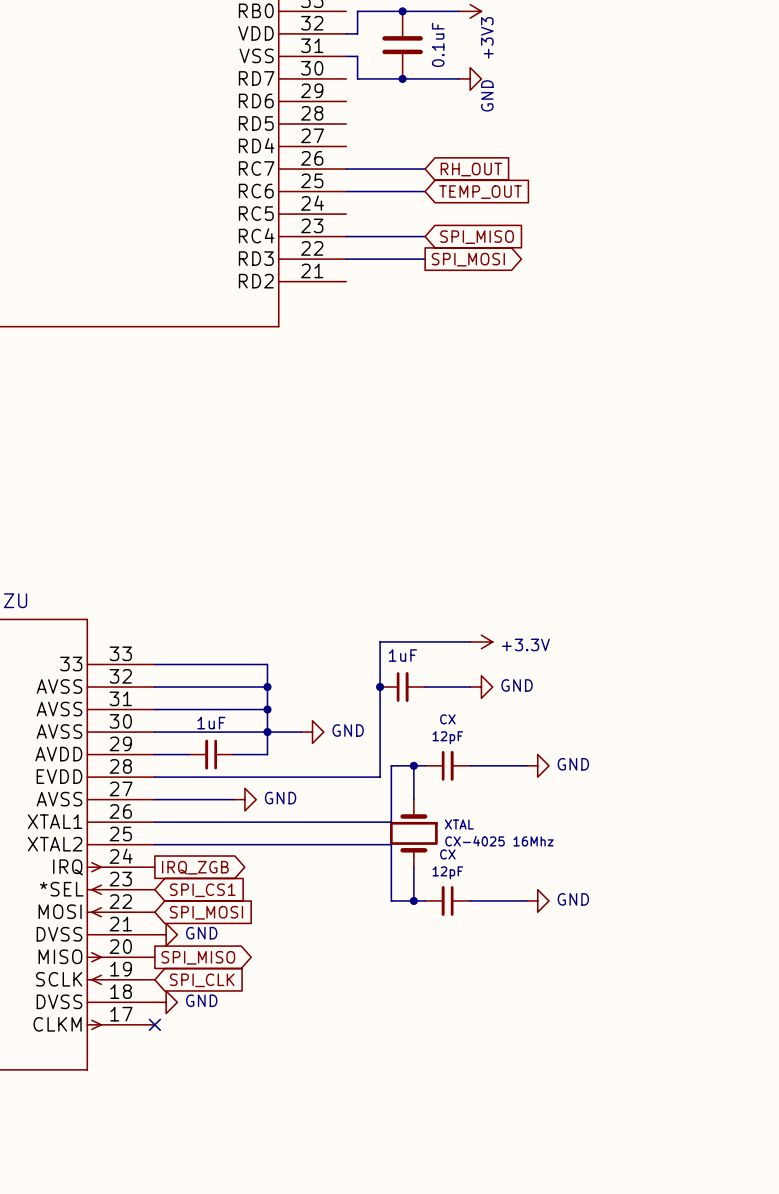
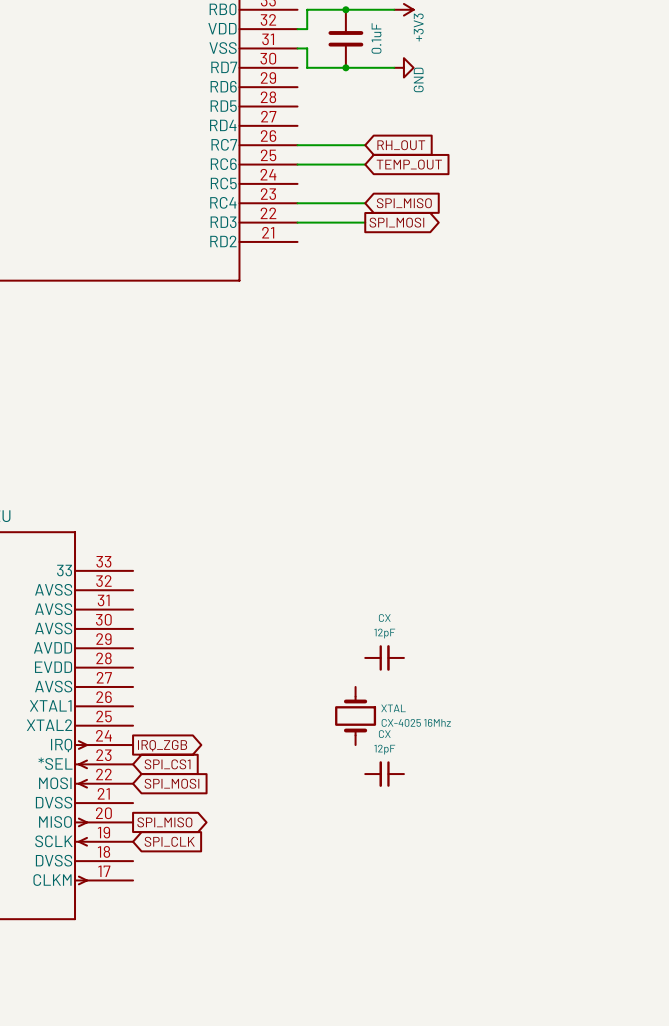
wire: (470, 641) (380, 641) (380, 777) (154, 777) -> none
power symbol: +3.3V (481, 641) -> none
wire: (154, 664) (267, 664) (267, 754) (233, 754) -> none
wire: (154, 687) (267, 687) -> none
junction: (267, 687) -> none
junction: (380, 687) -> none
part: 1uF (402, 687) -> none
wire: (425, 687) (470, 687) -> none
power symbol: GND (481, 687) -> none
wire: (154, 709) (267, 709) -> none
junction: (267, 709) -> none
wire: (154, 732) (301, 732) -> none
junction: (267, 732) -> none
power symbol: GND (312, 732) -> none
wire: (154, 754) (188, 754) -> none
part: 1uF (211, 754) -> none
wire: (413, 765) (413, 799) -> none
junction: (413, 765) -> none
wire: (425, 765) (391, 765) (391, 822) (154, 822) -> none
wire: (470, 765) (526, 765) -> none
power symbol: GND (537, 765) -> none
wire: (154, 799) (233, 799) -> none
power symbol: GND (244, 799) -> none
wire: (154, 844) (391, 844) (391, 900) (425, 900) -> none
wire: (413, 867) (413, 900) -> none
junction: (413, 900) -> none
wire: (470, 900) (526, 900) -> none
power symbol: GND (537, 900) -> none
power symbol: GND (166, 934) -> none
power symbol: GND (166, 1002) -> none
no-connect mark: (154, 1024) -> none

